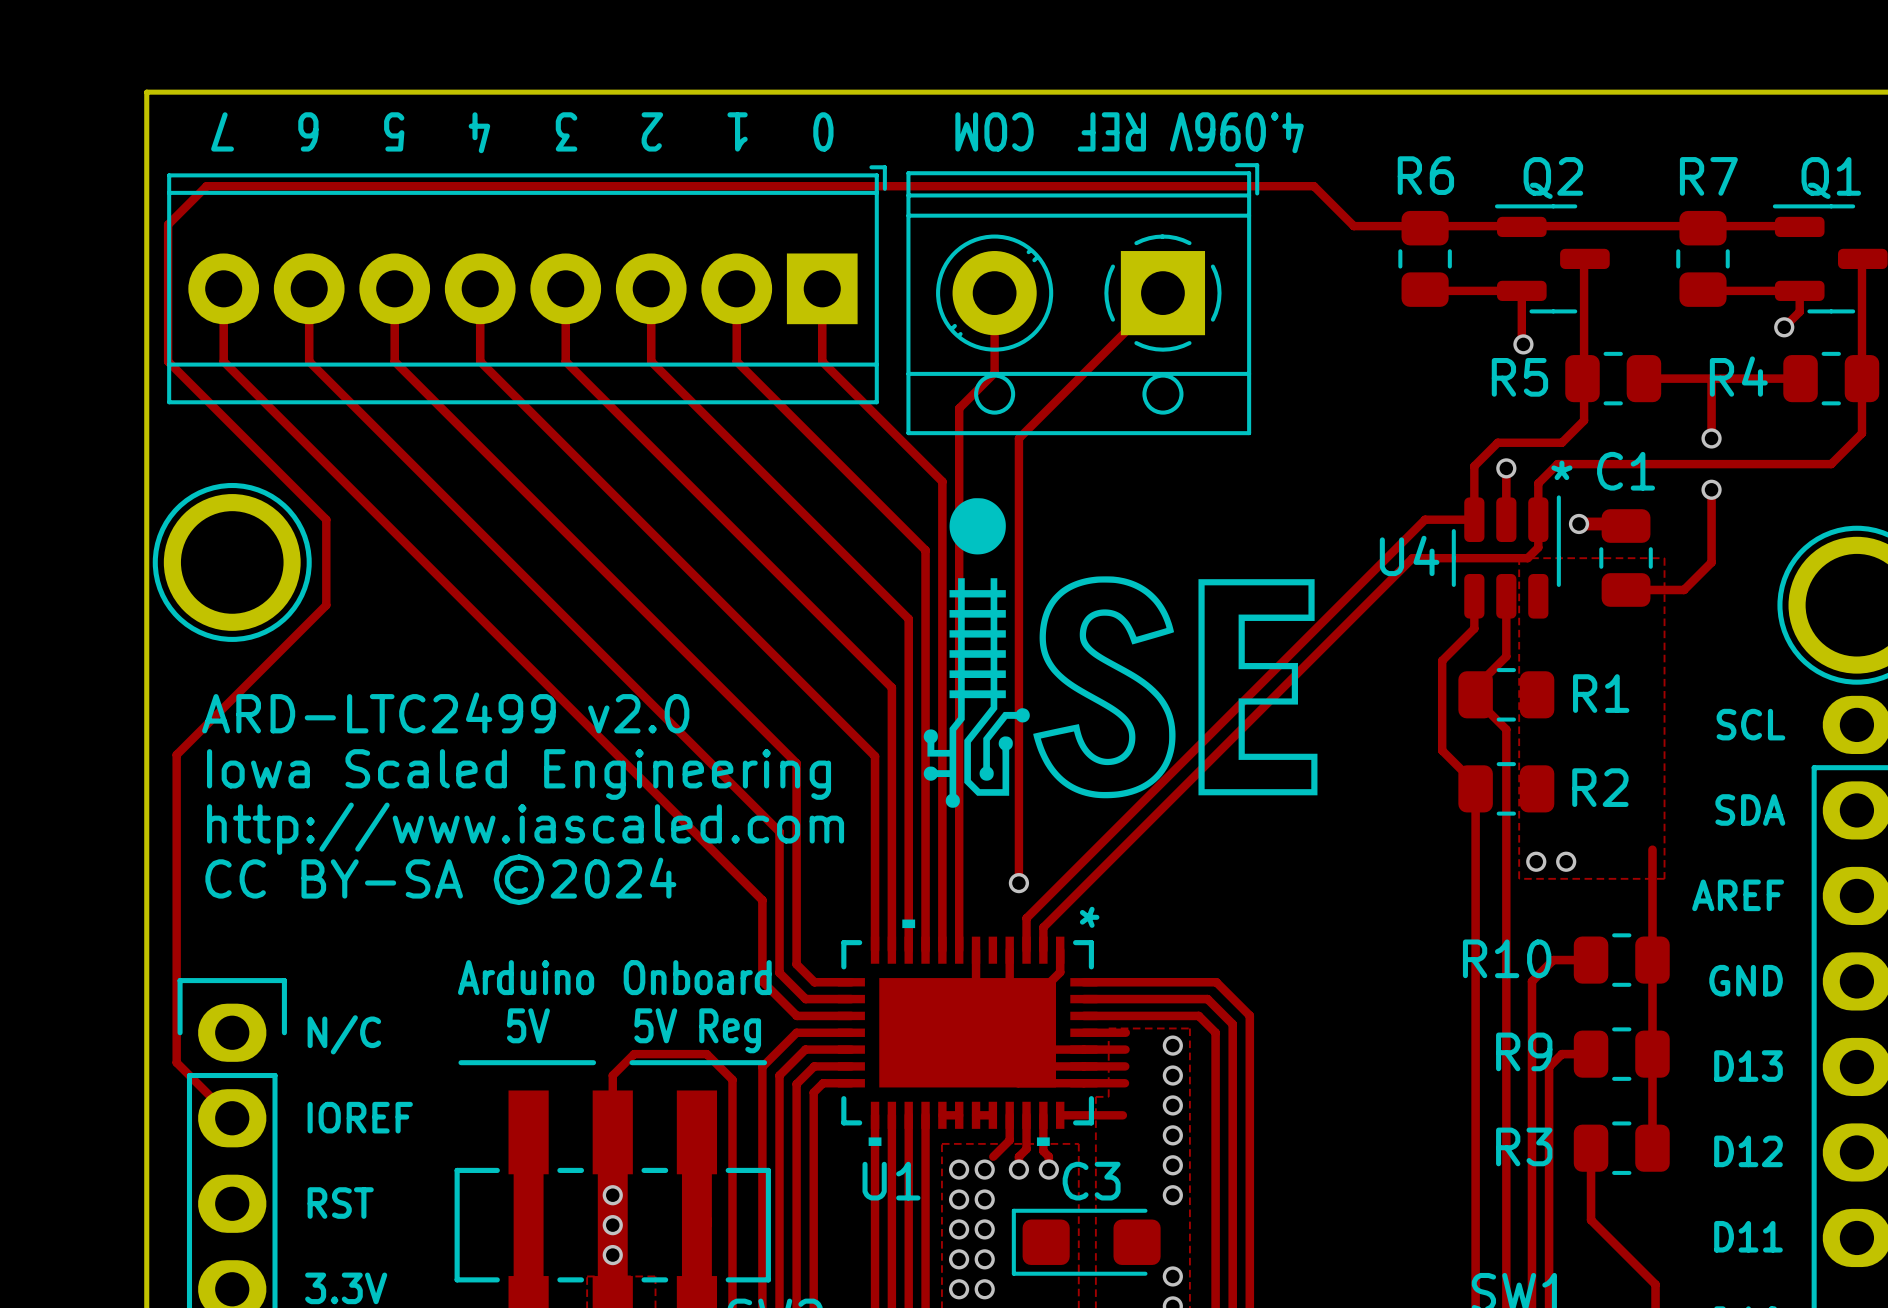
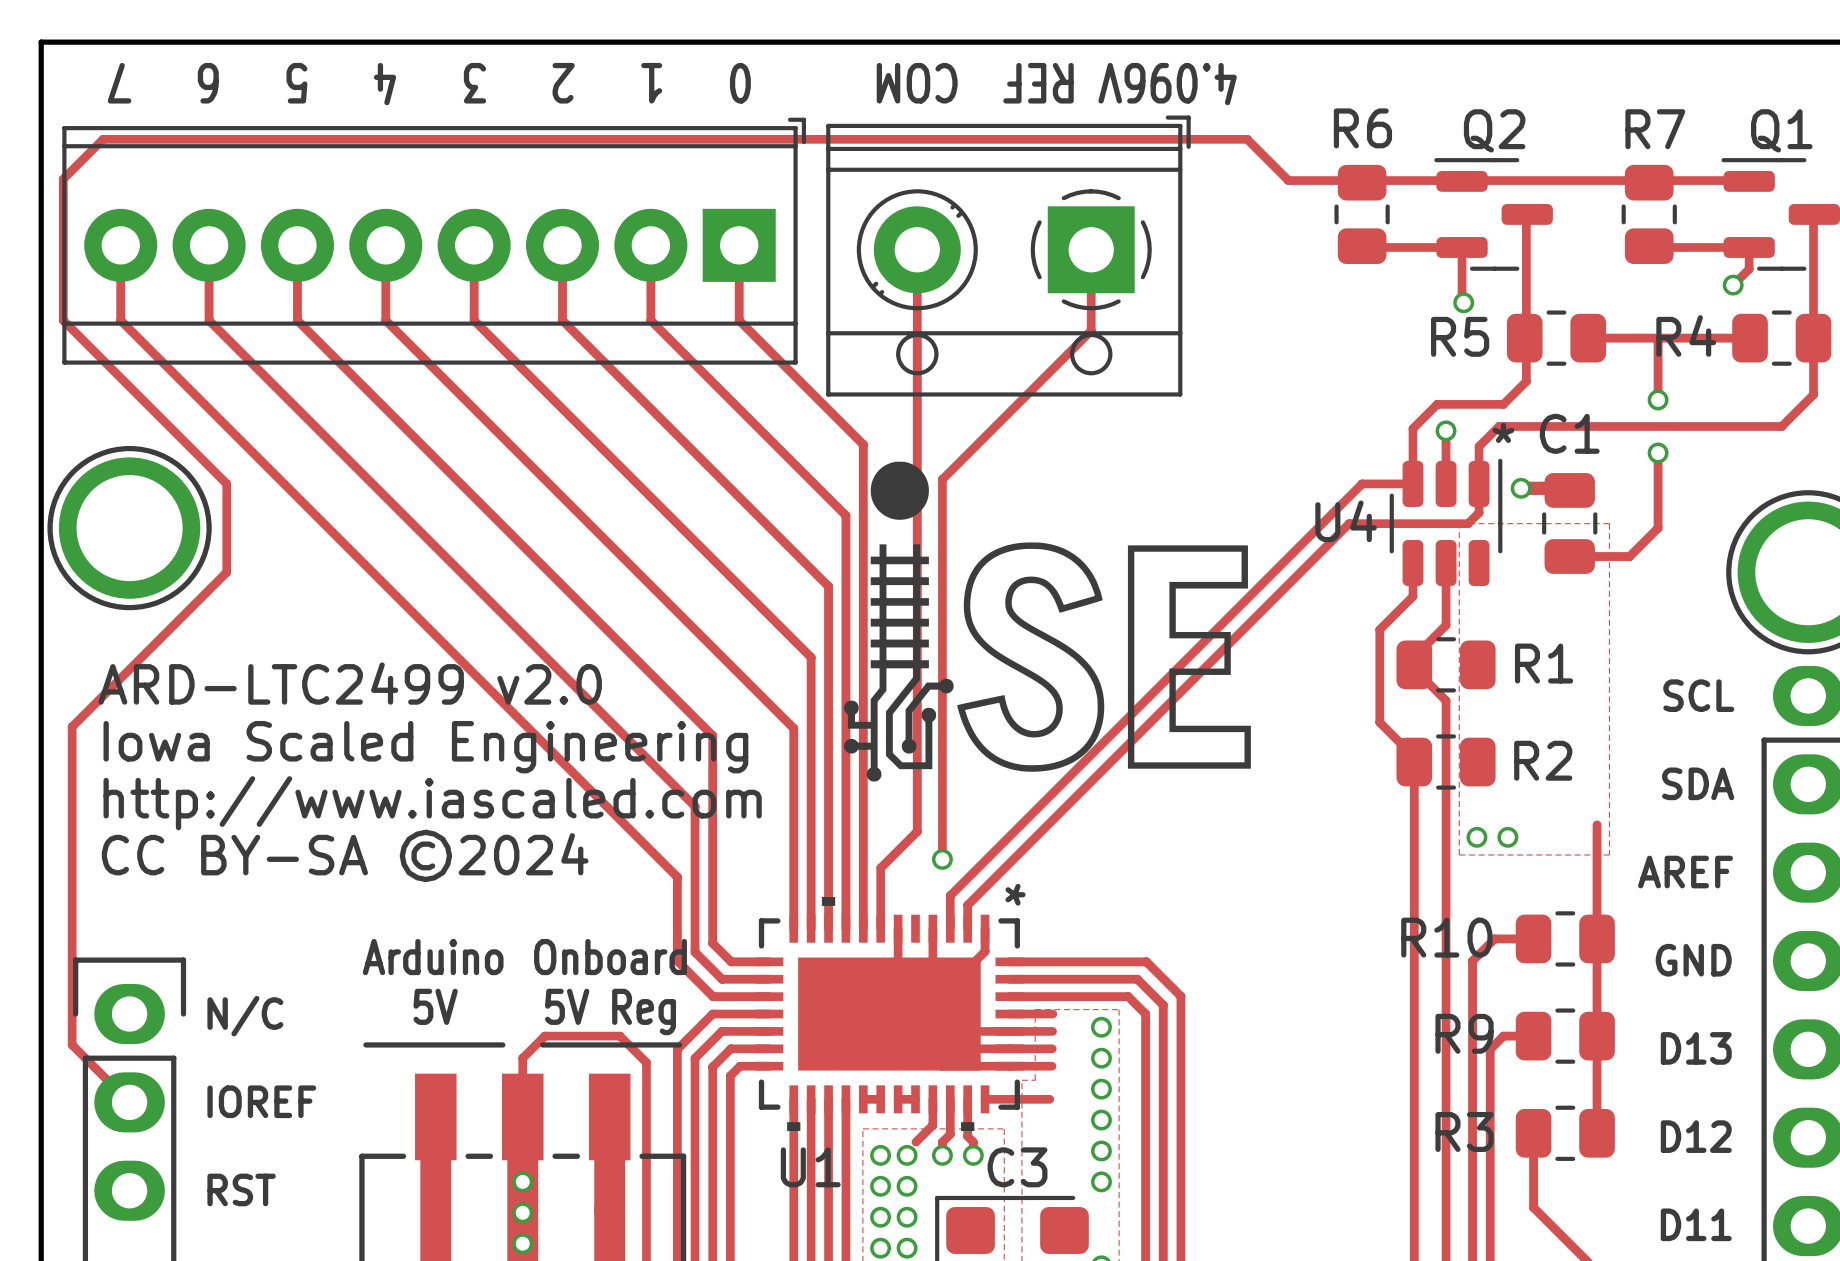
track: (1162, 294) (1018, 438) (1018, 515) -> (1091, 251) (1091, 330) (942, 479)
track: (994, 372) (959, 408) (959, 891) -> (917, 332) (917, 831) (880, 868)

